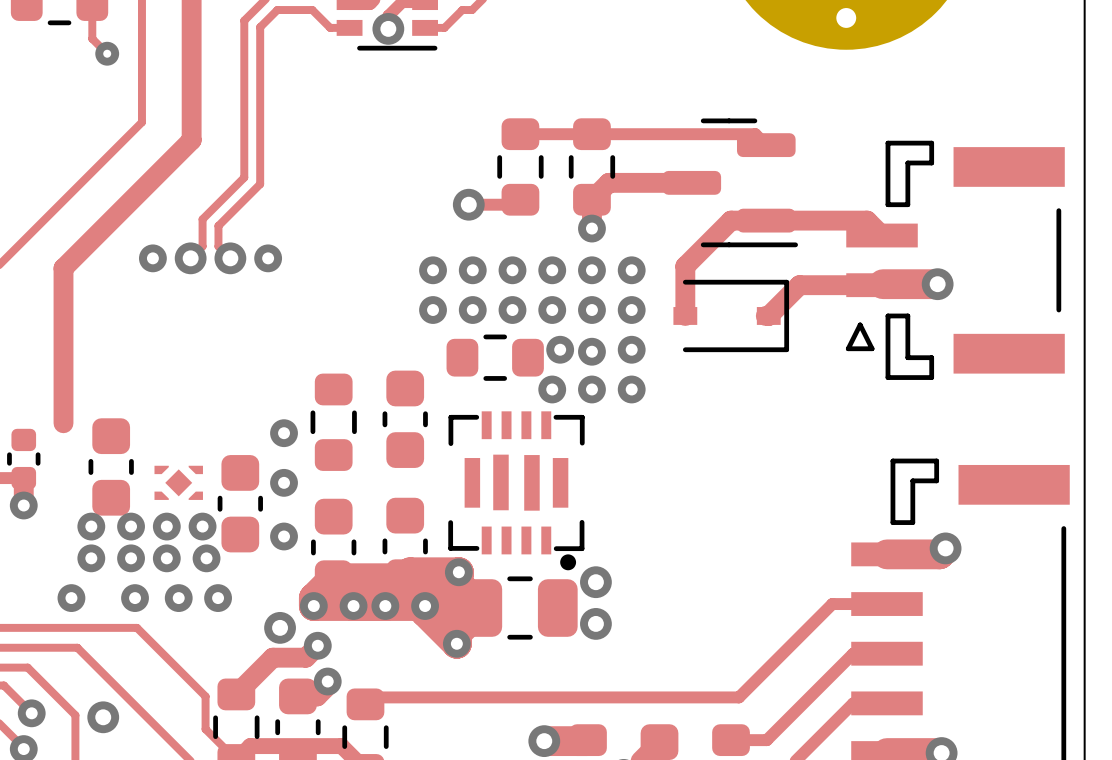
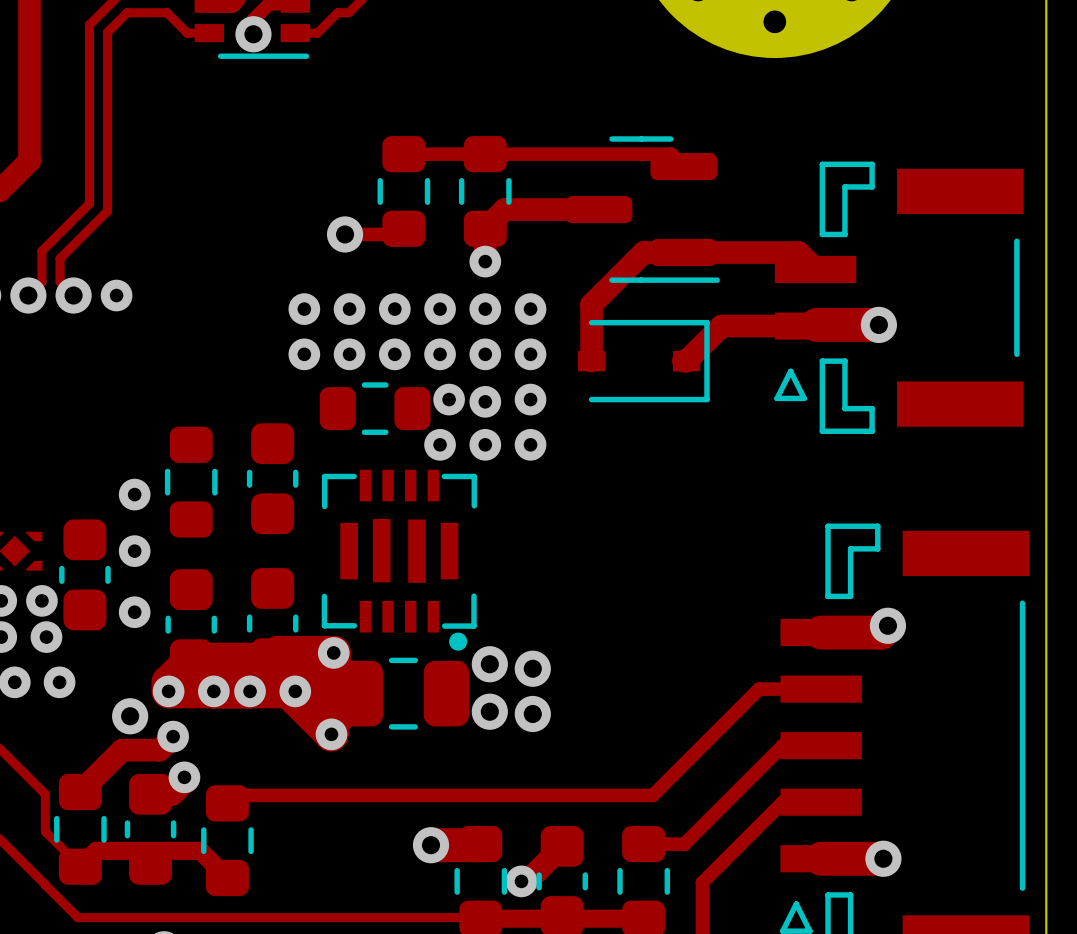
via: none -> (532, 668)
via: none -> (532, 714)

